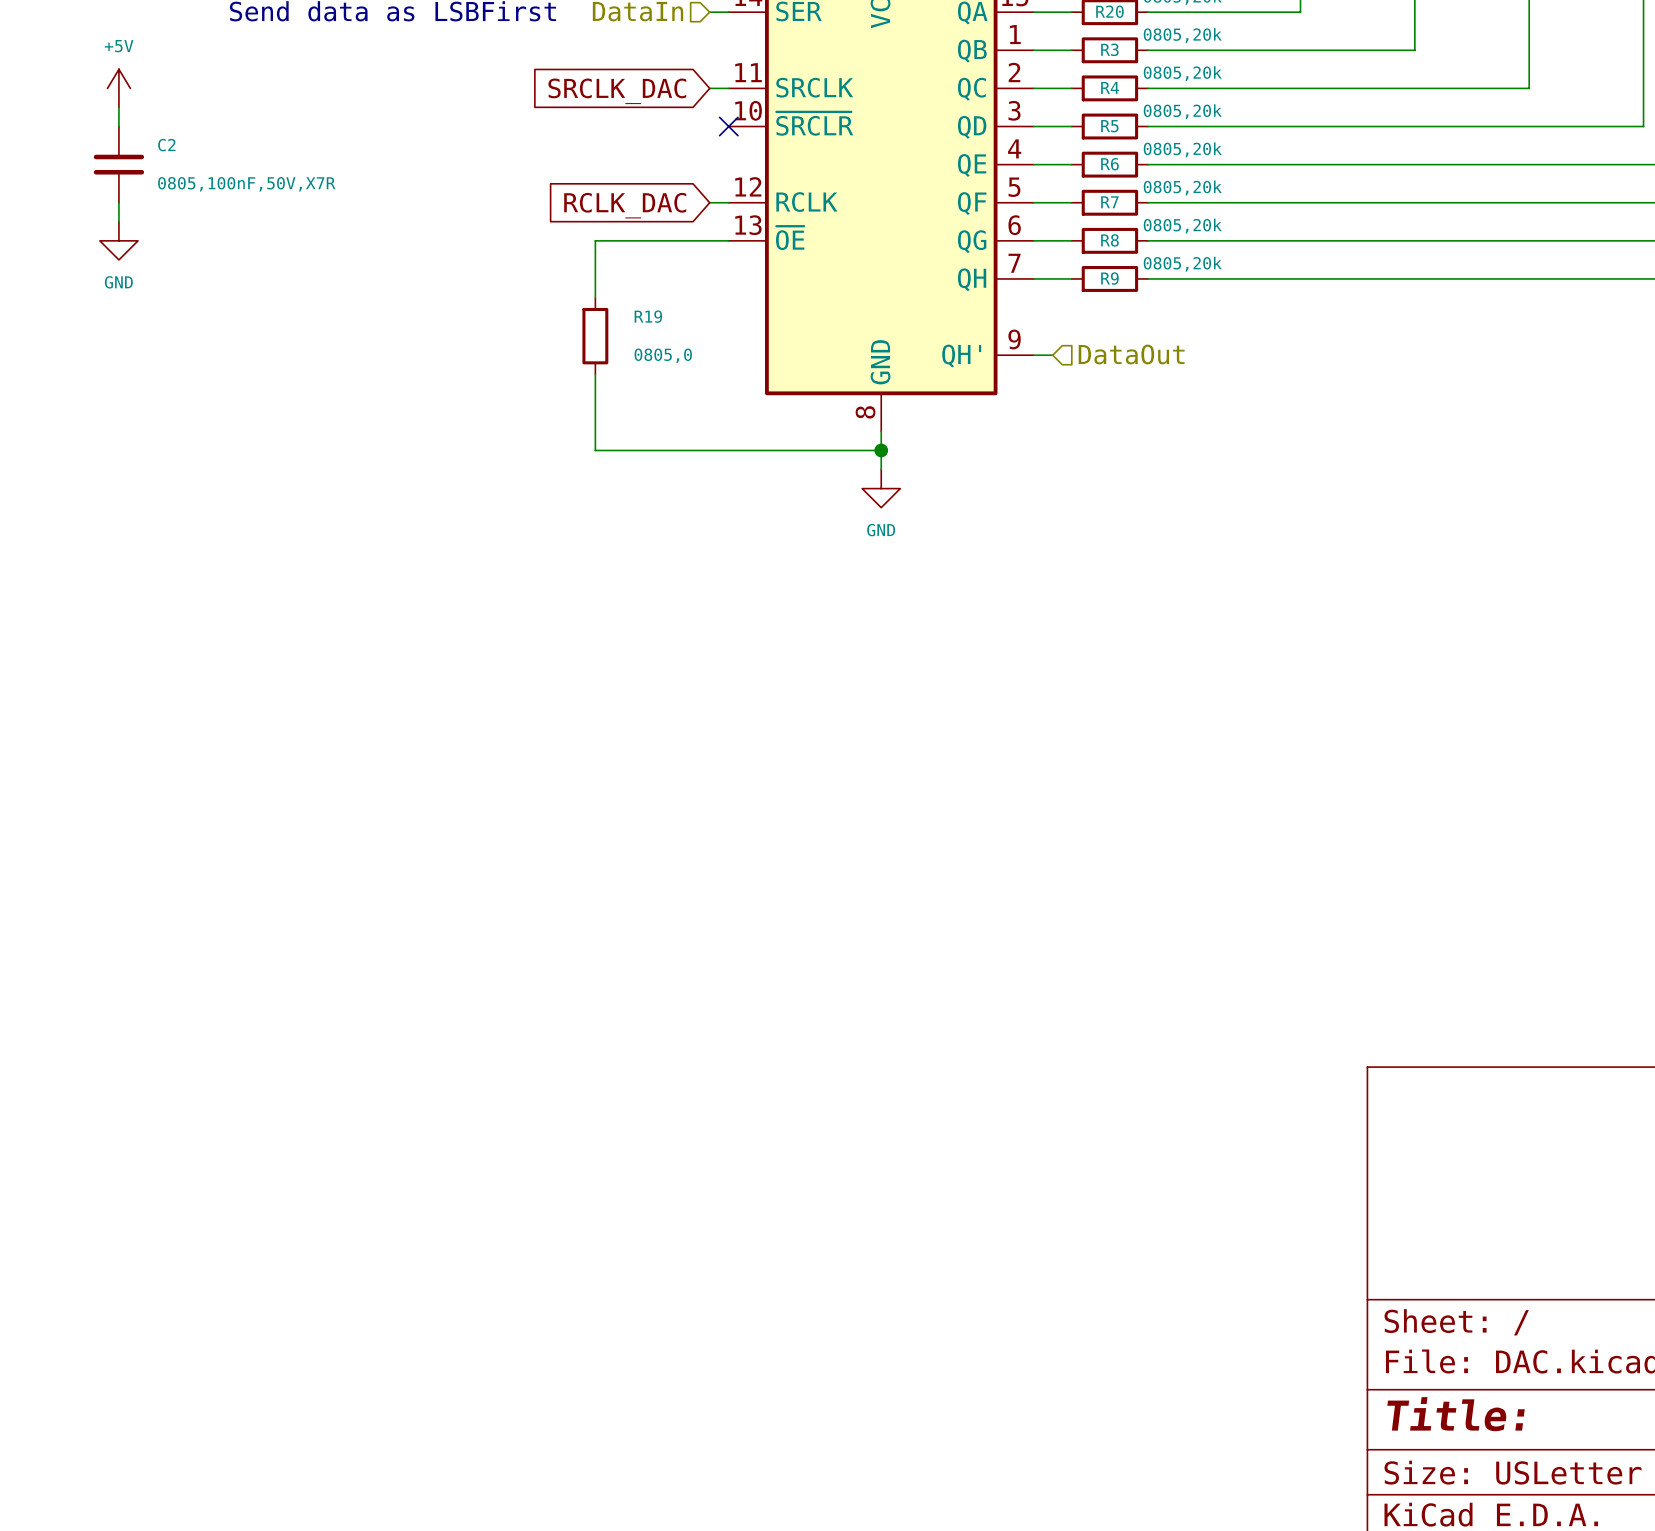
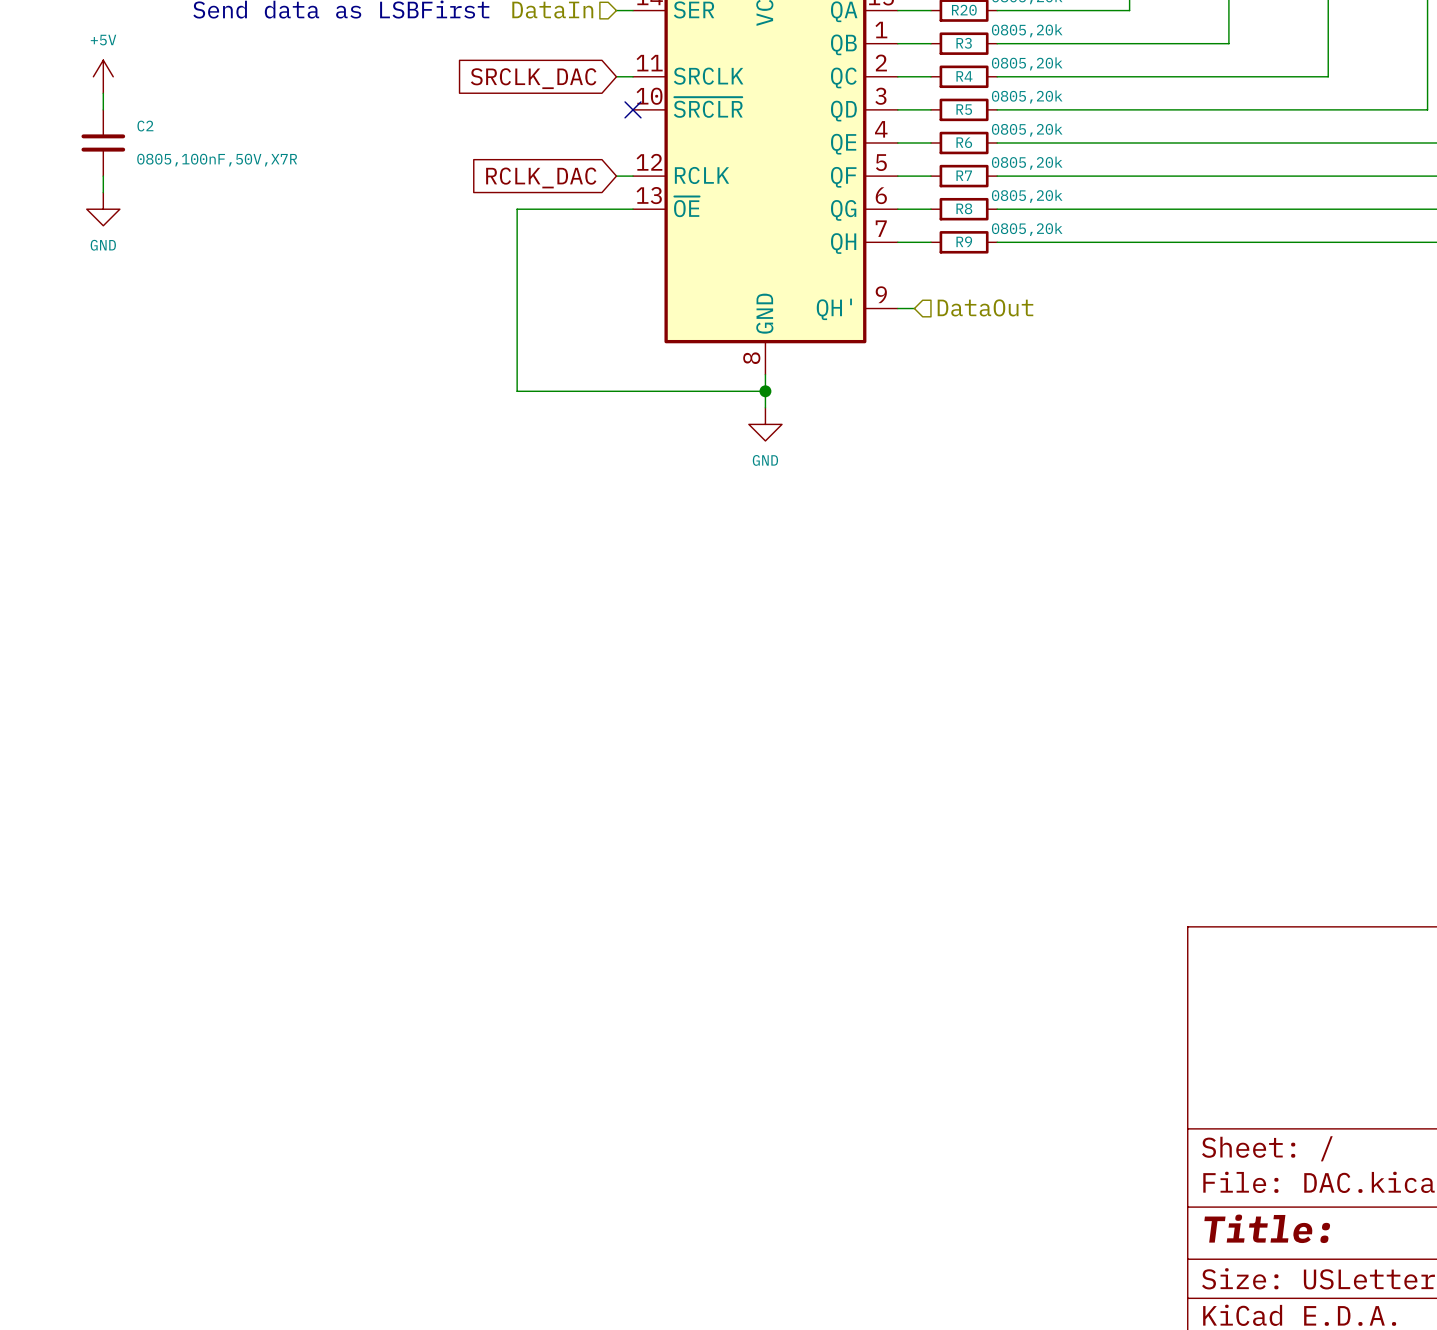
wire: none -> (517, 258) (517, 325)
R19: 0805,0 (595, 336) -> none

